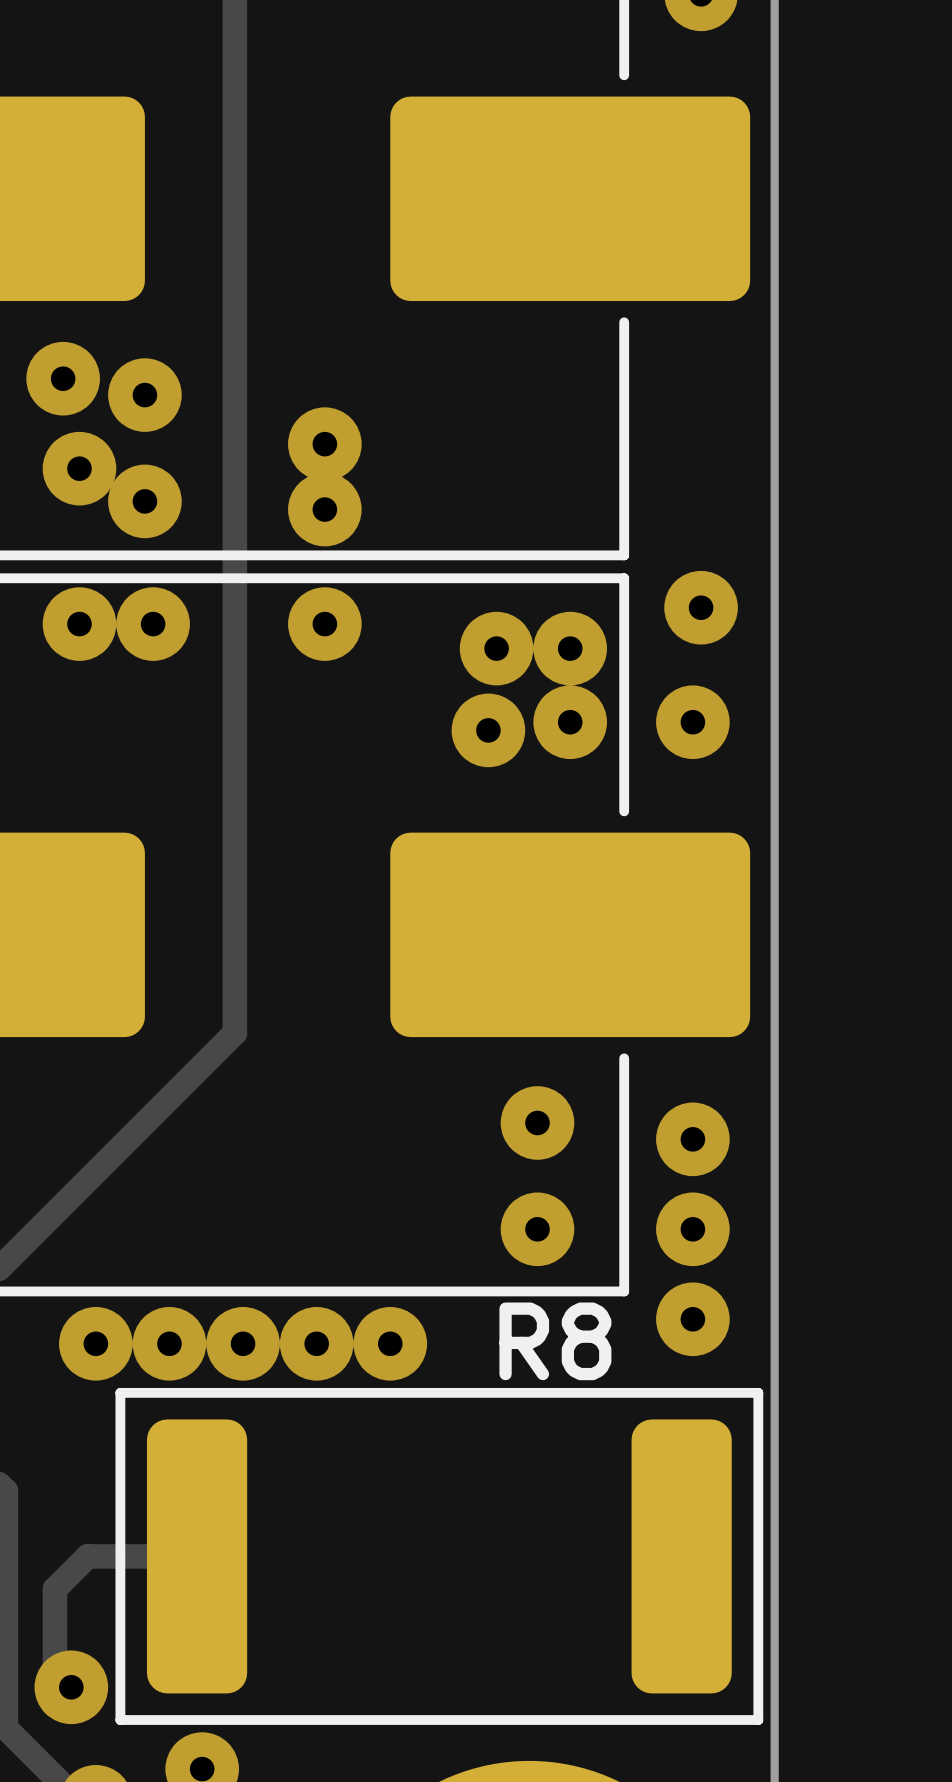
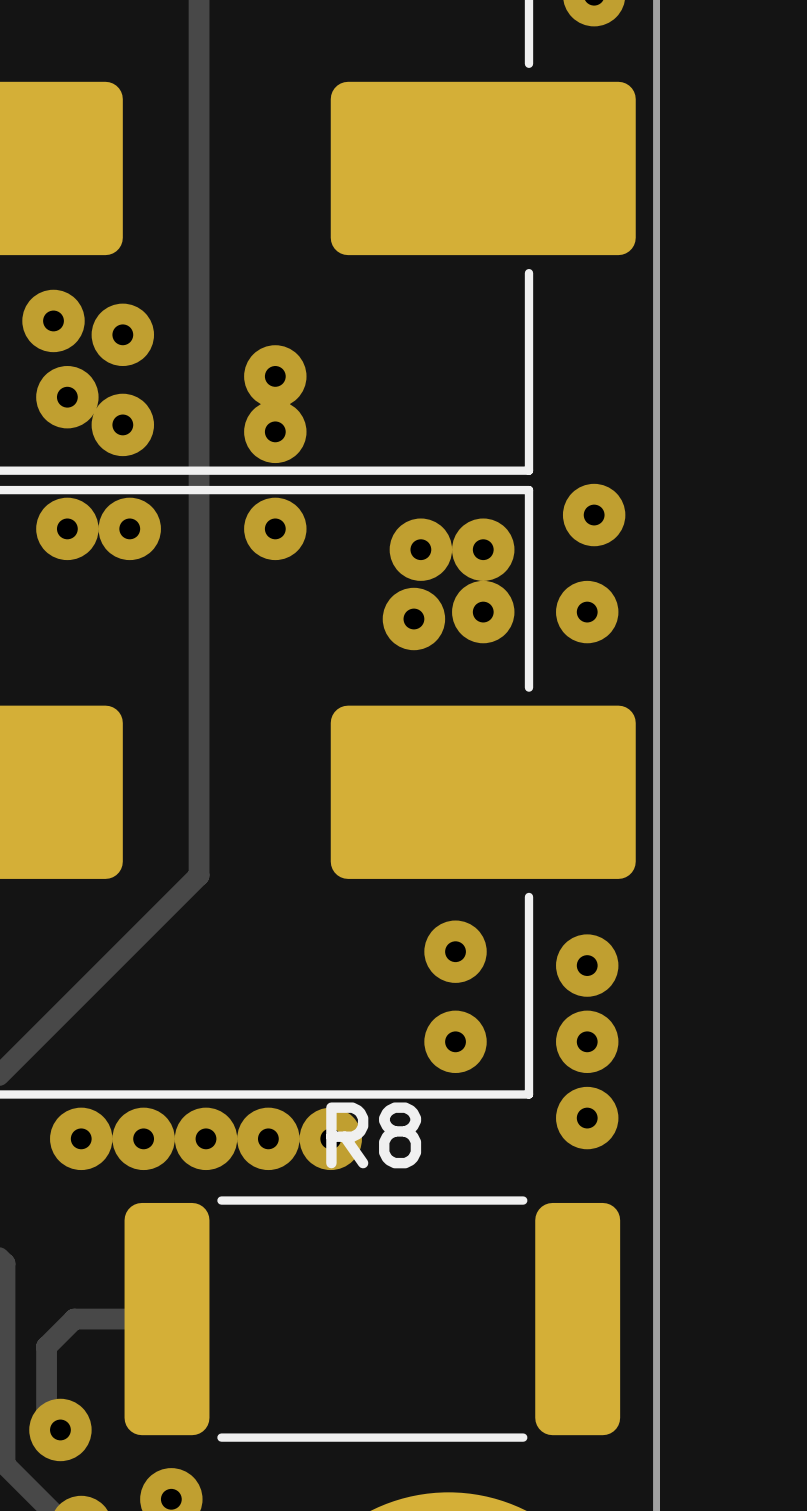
R8 footprint: [115, 1387, 764, 1725] -> [124, 1196, 621, 1442]

